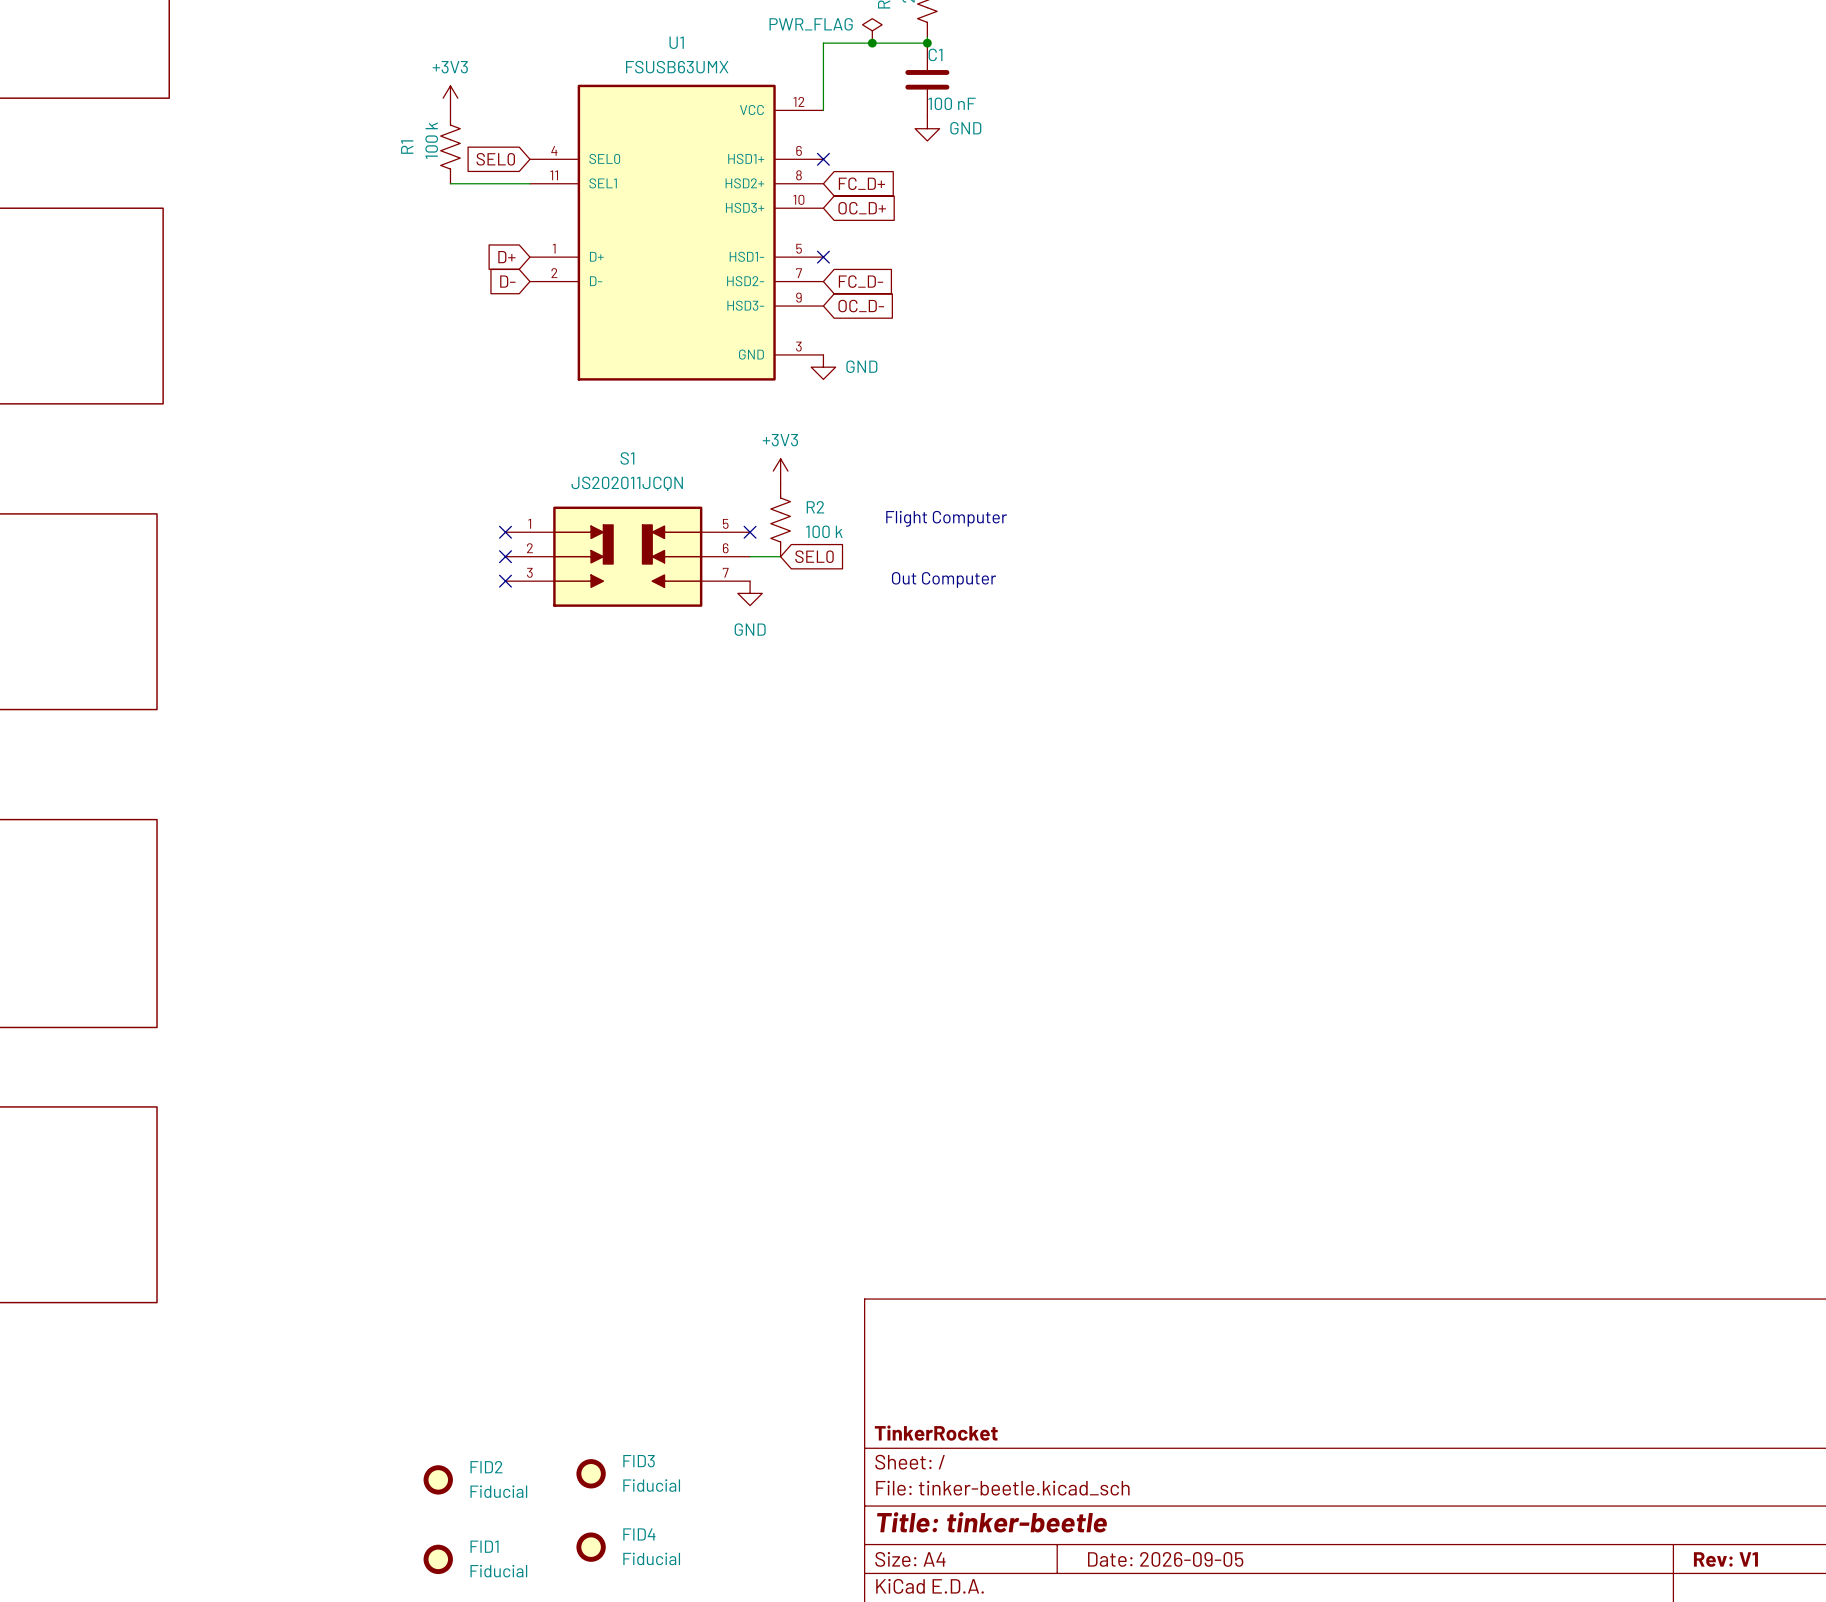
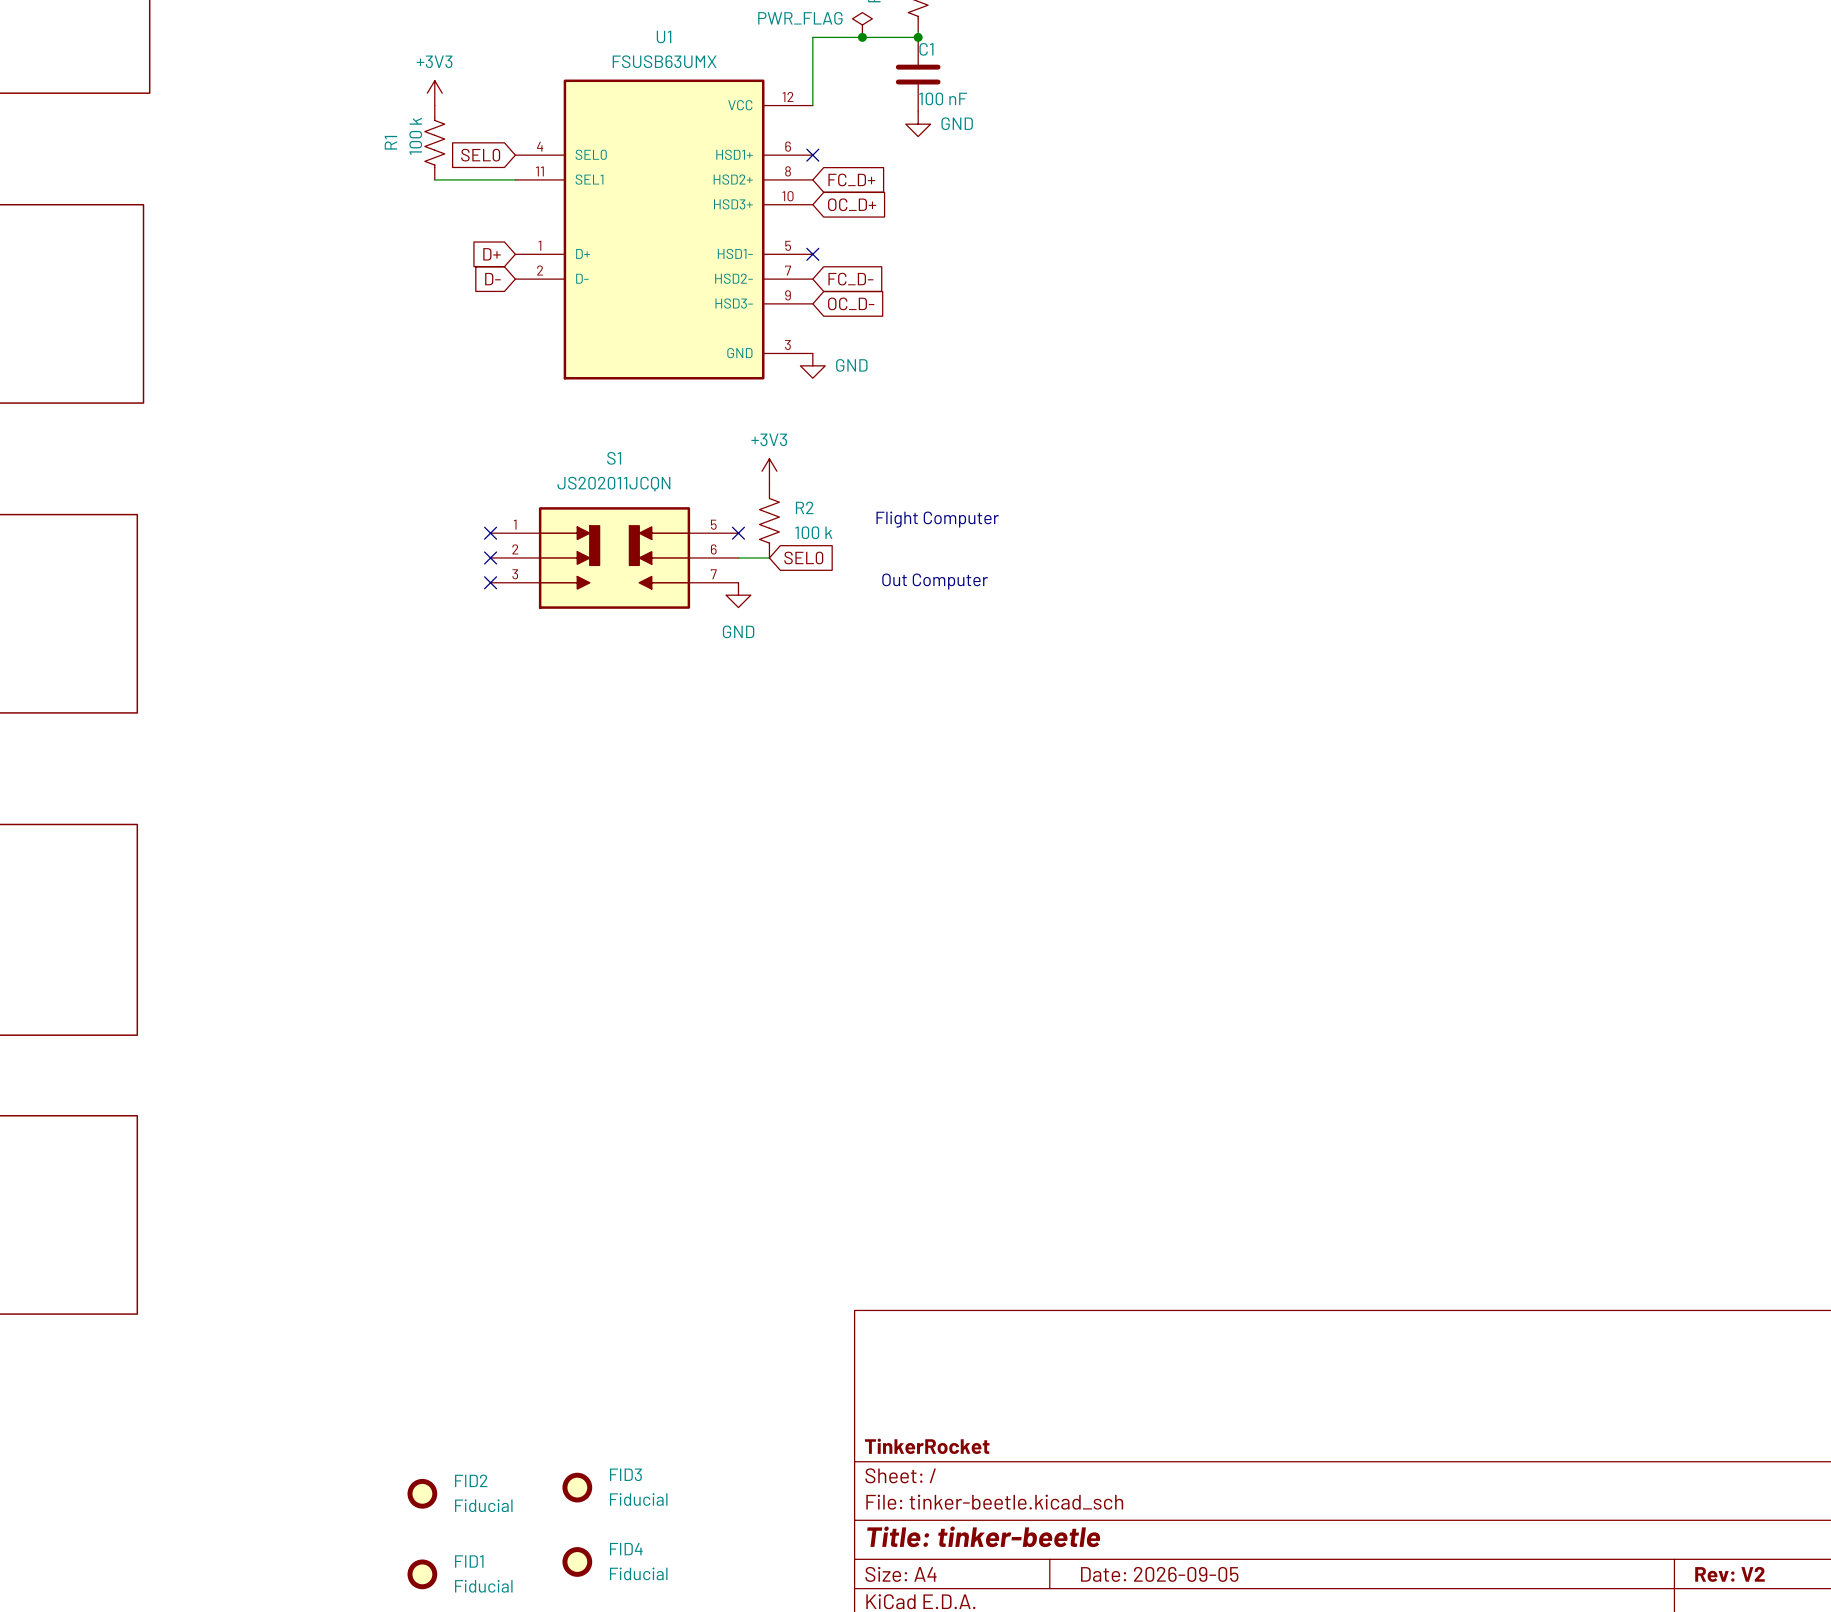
title block: Rev: V1 (1725, 1559) -> Rev: V2 (1729, 1574)

